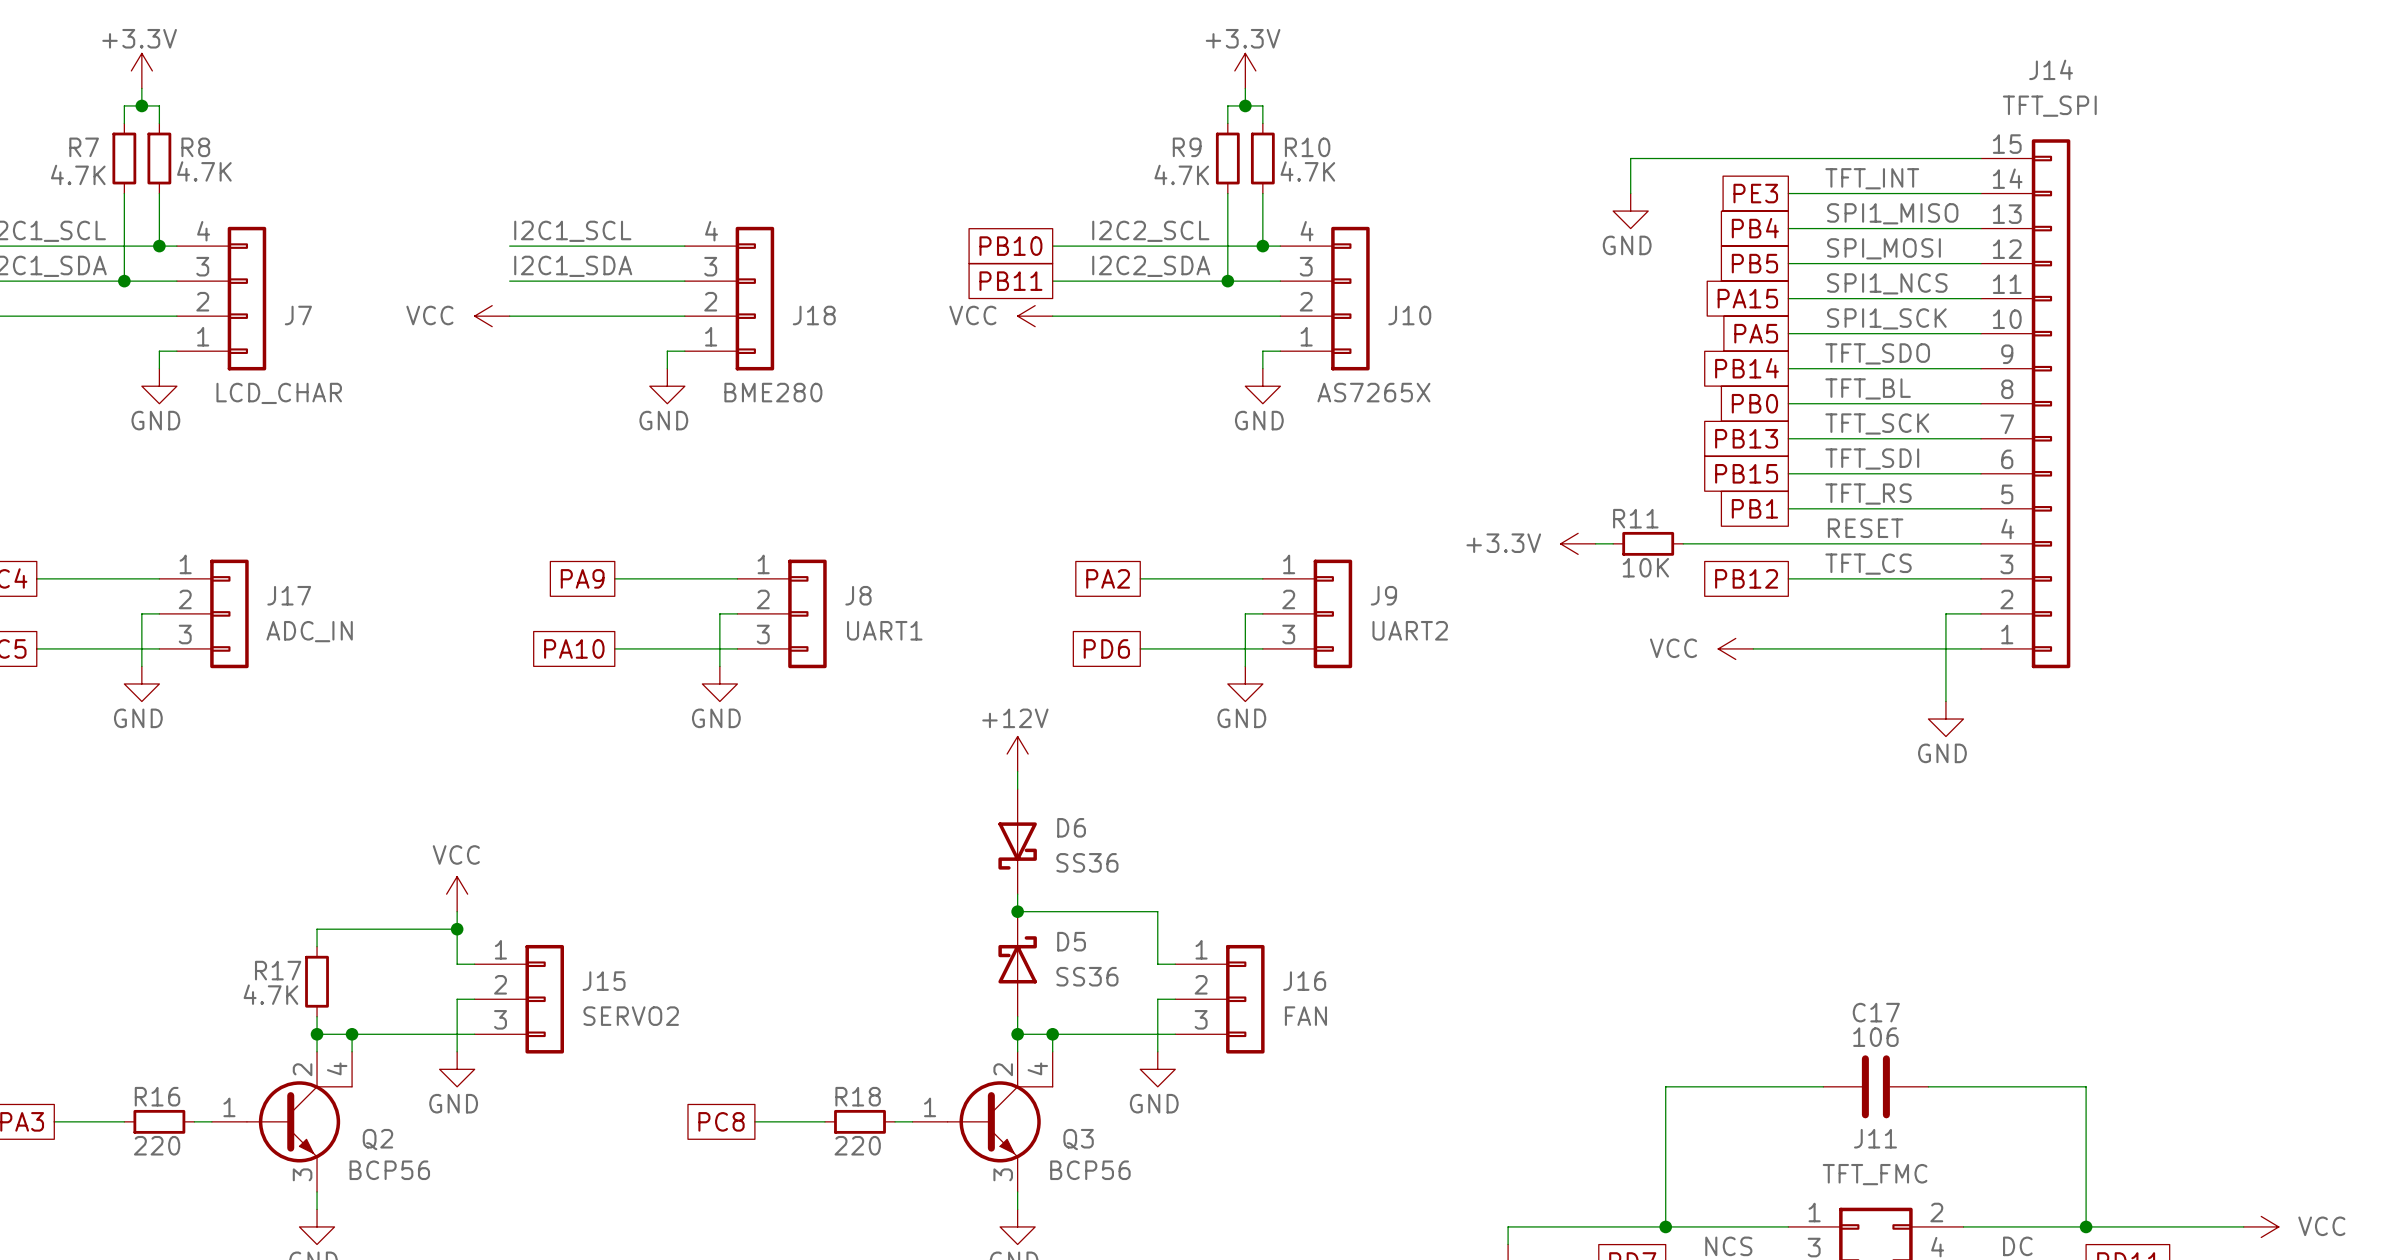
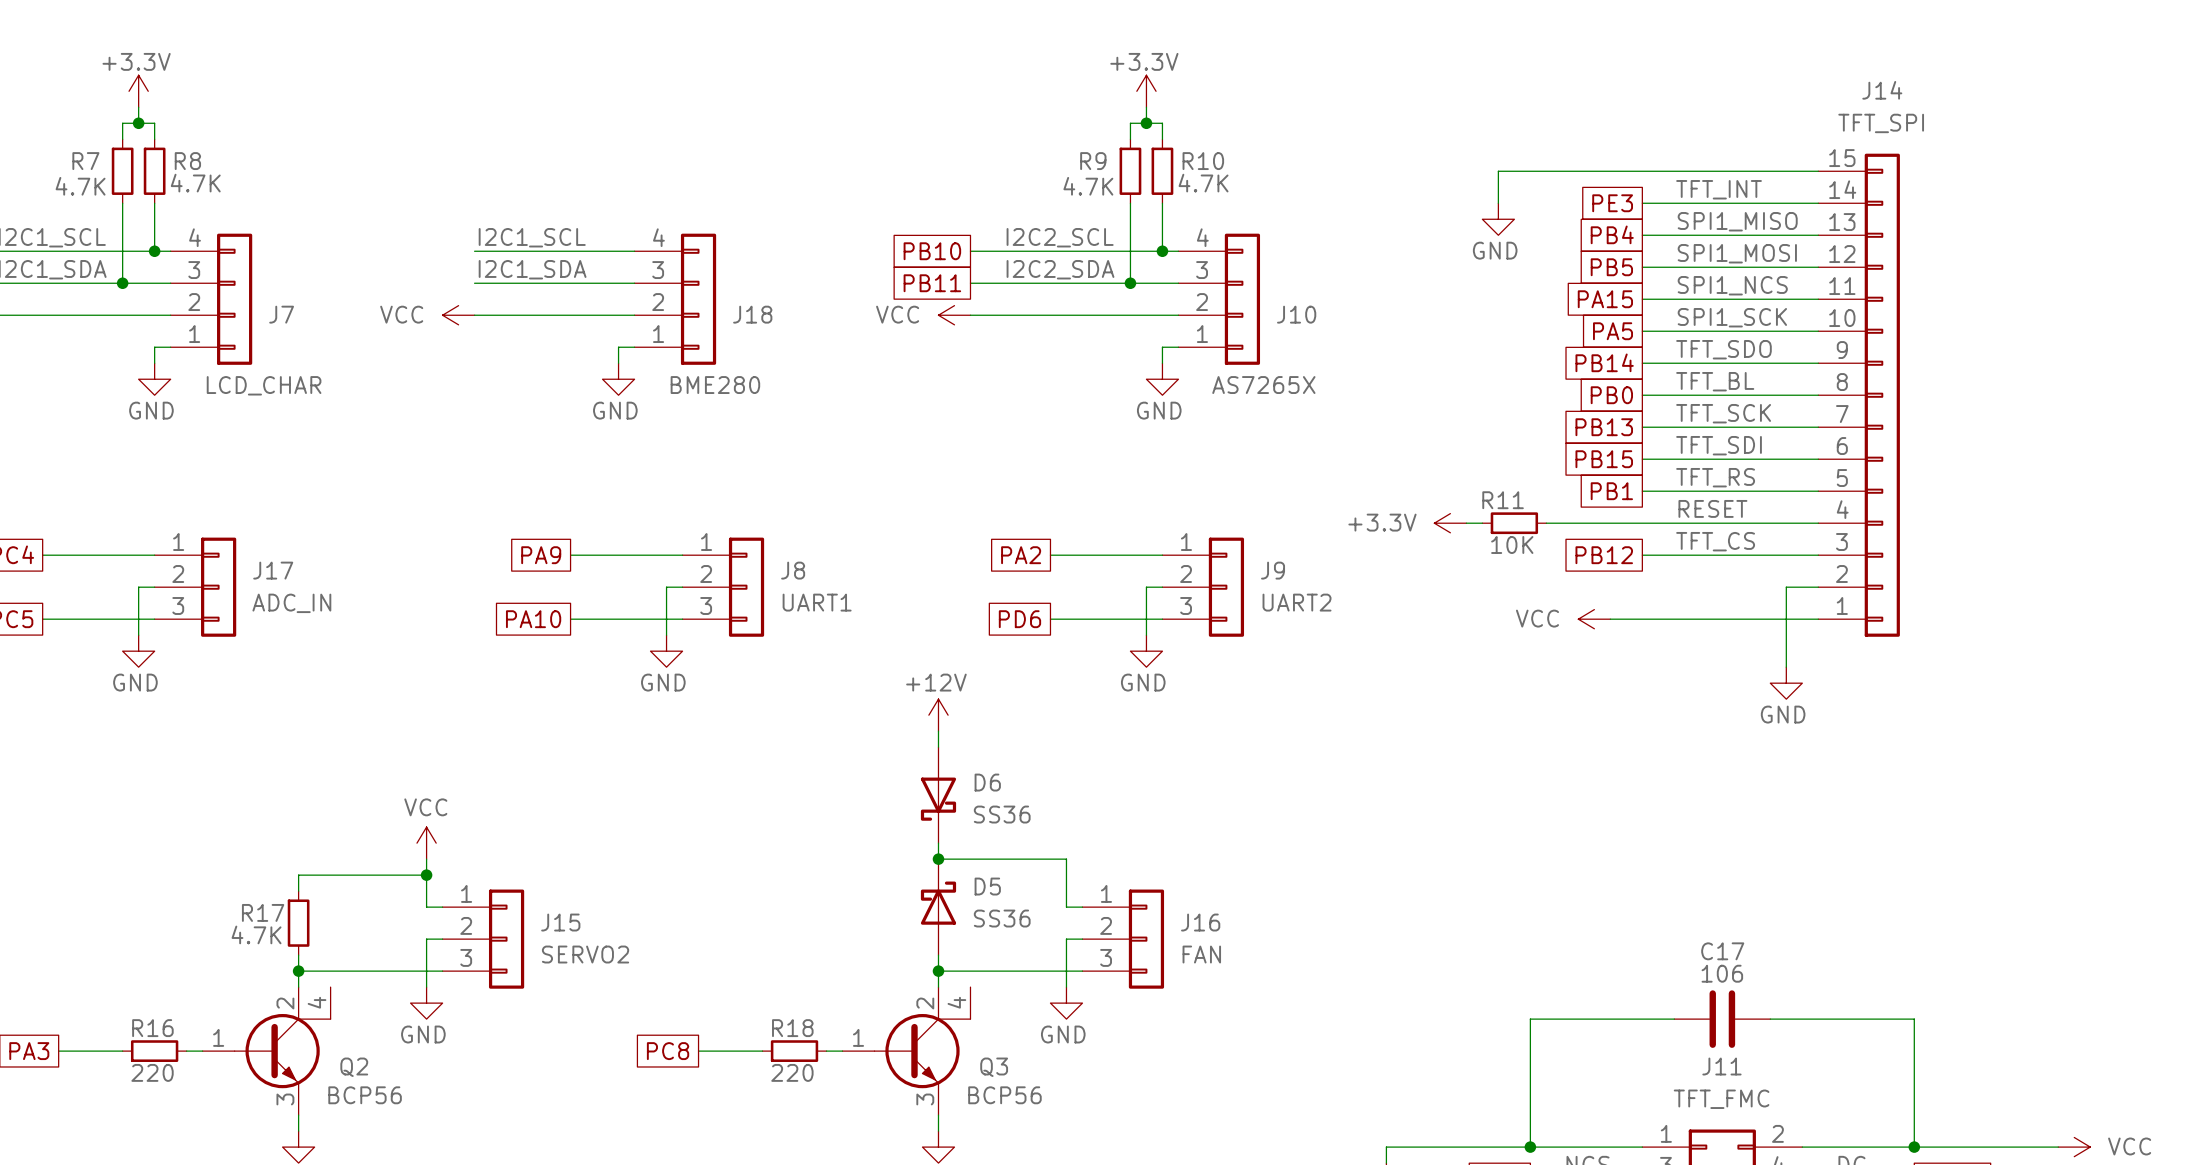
label: SPI_MOSI (1883, 248) -> SPI1_MOSI (1737, 253)
wire: (352, 1034) (352, 1051) -> none
junction: (352, 1034) -> none
wire: (1052, 1034) (1052, 1051) -> none
junction: (1052, 1034) -> none

